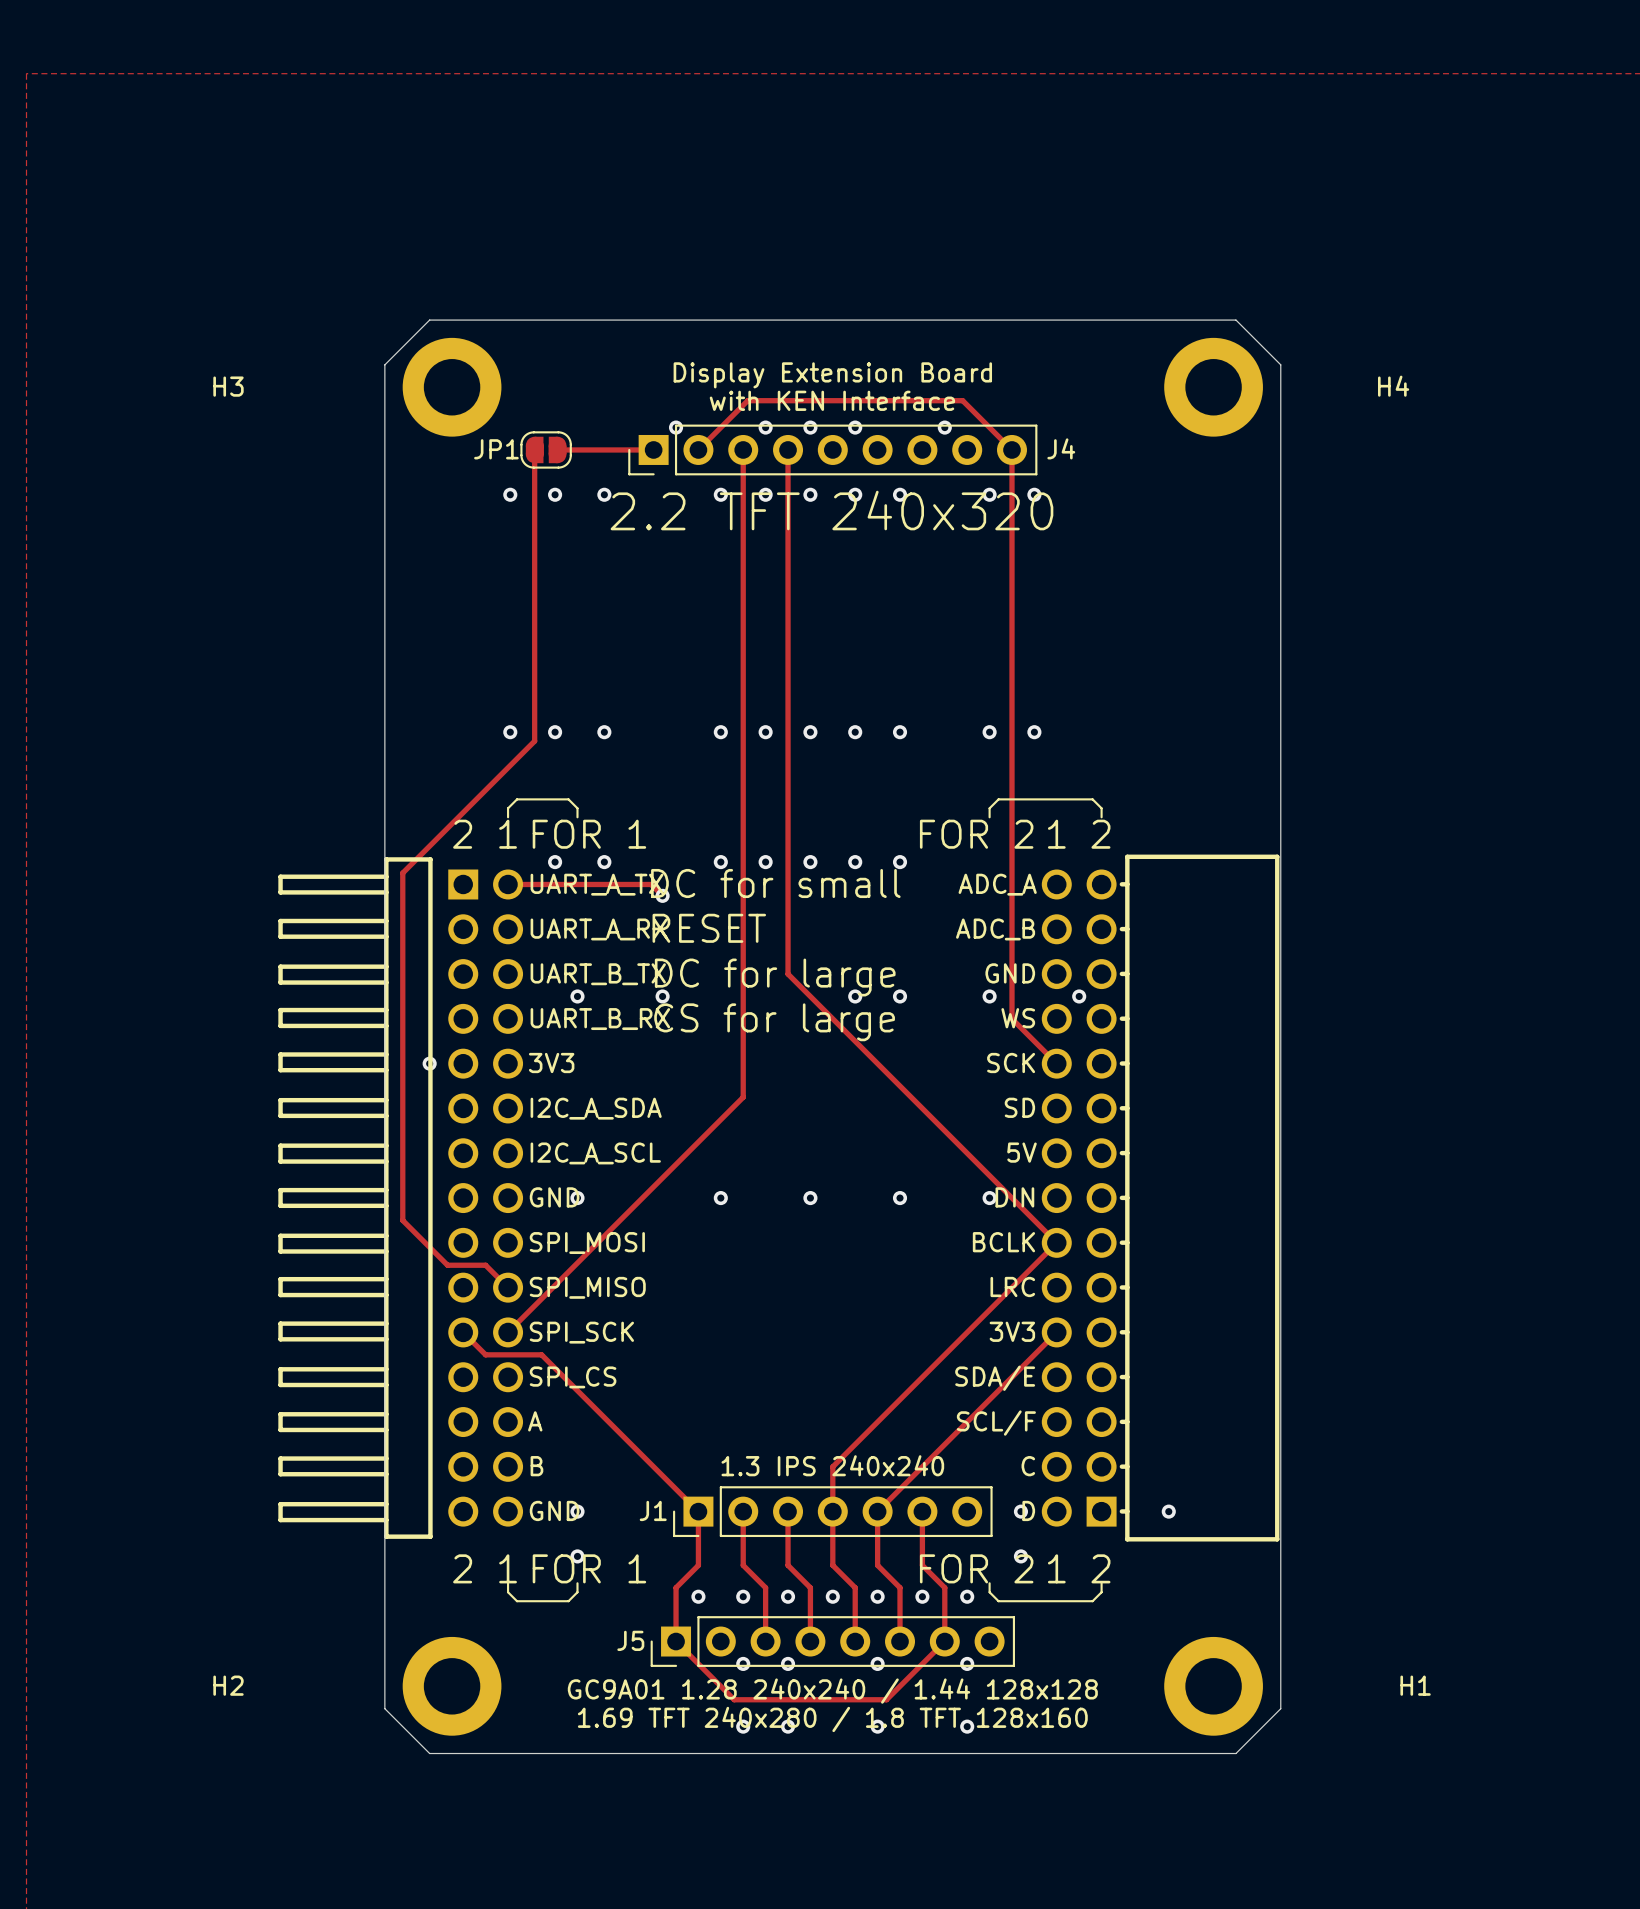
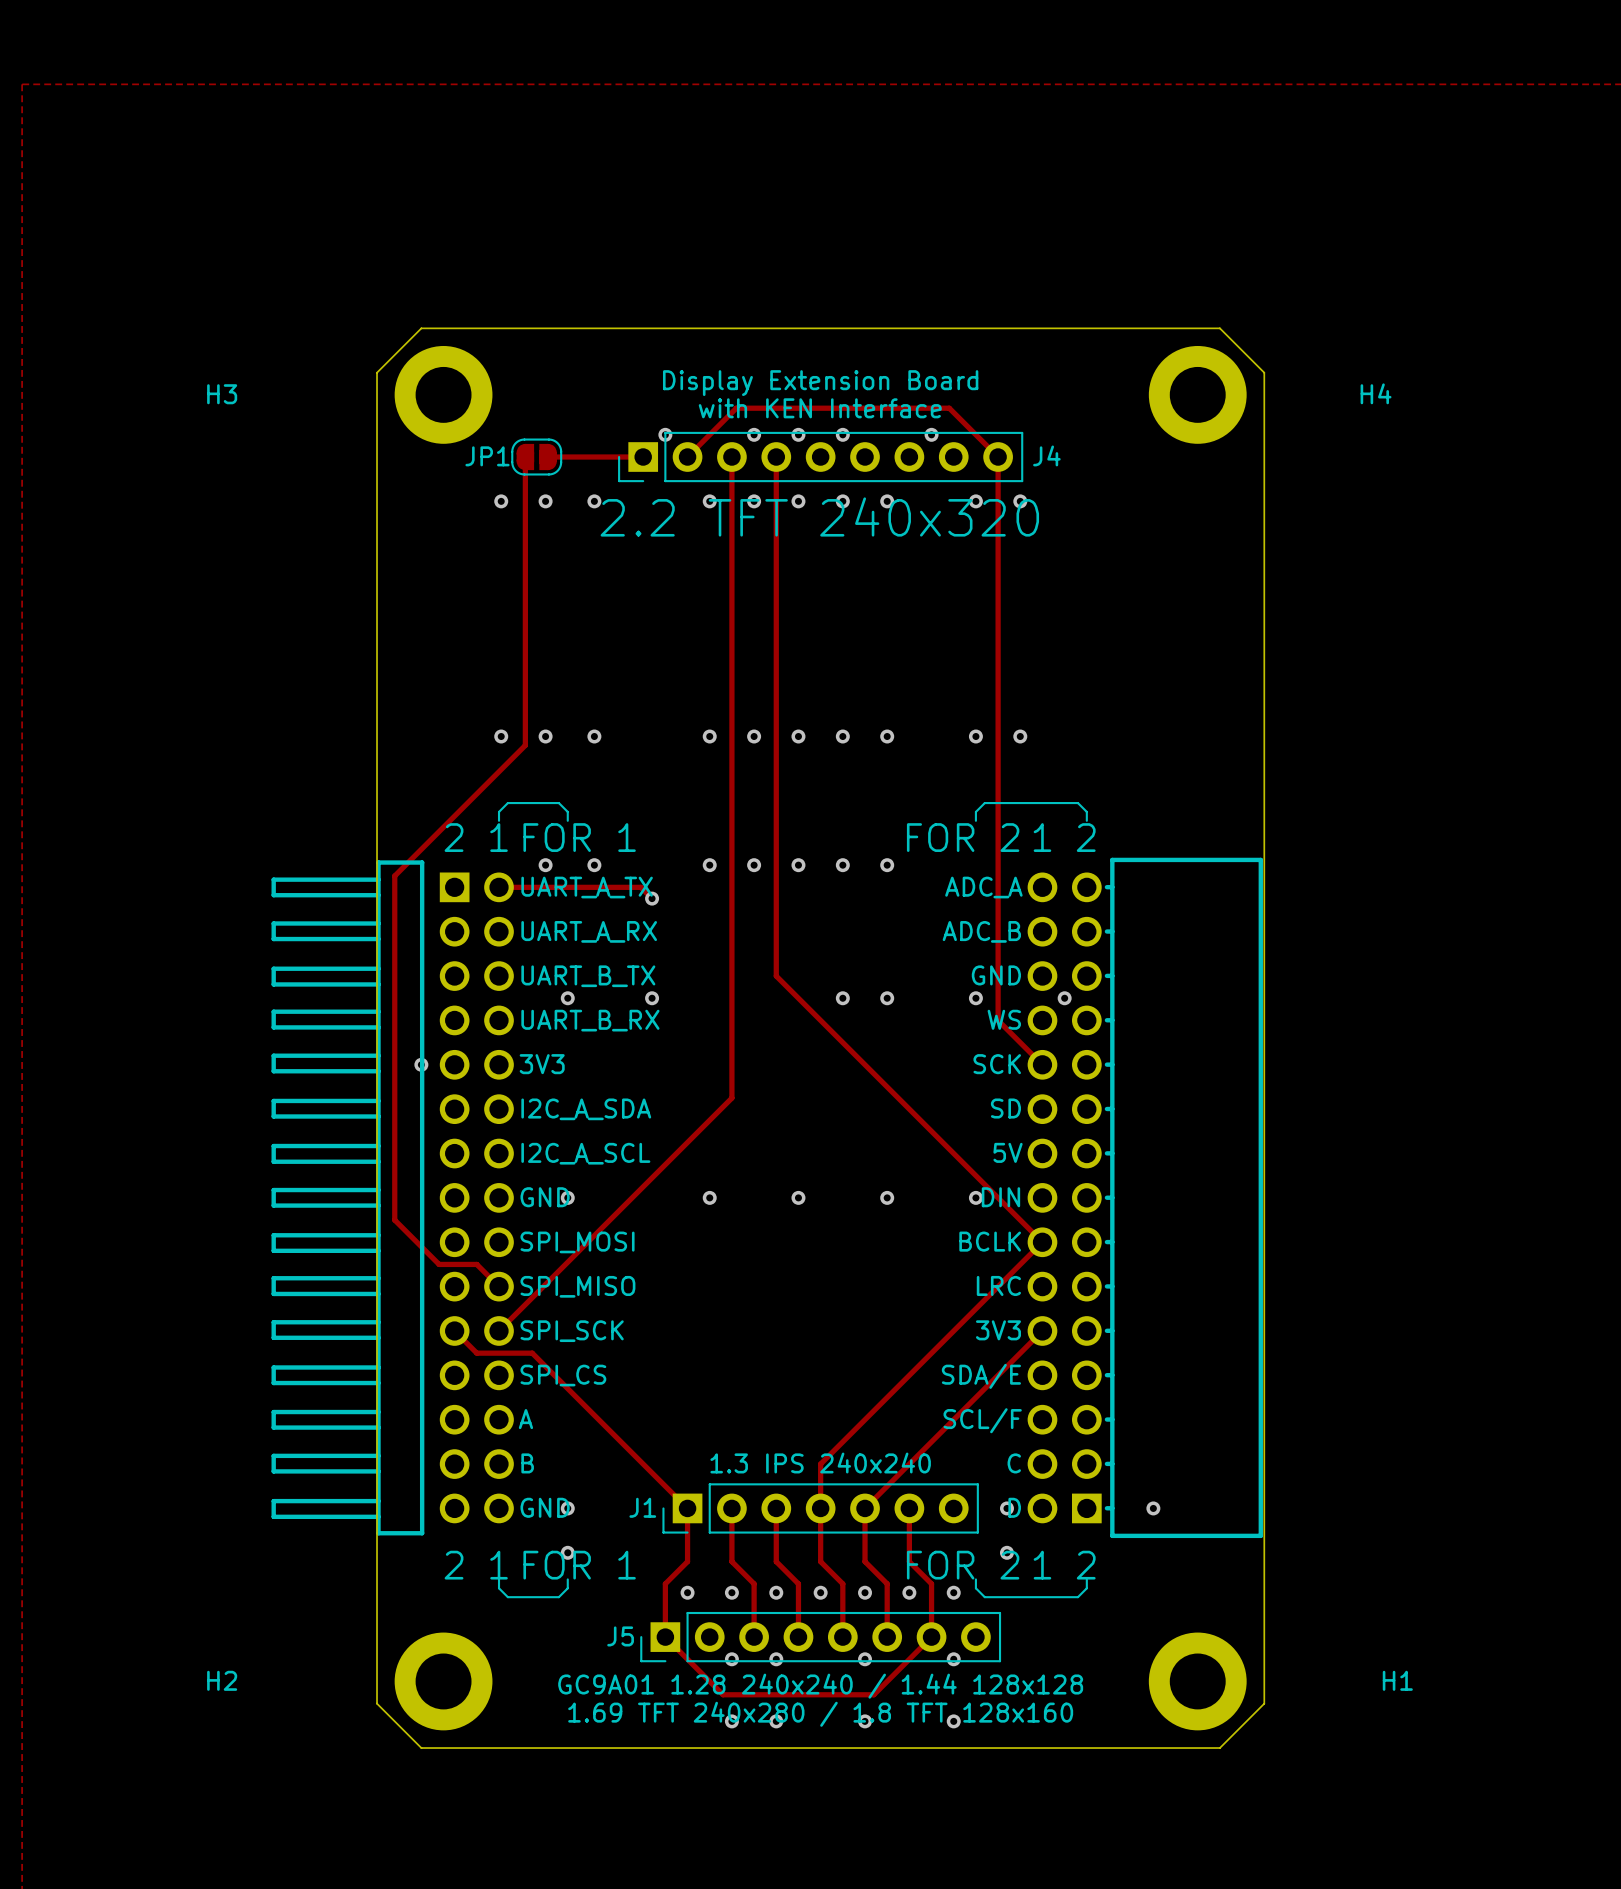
text: DC for small (775, 883) -> none
text: RESET (709, 928) -> none
text: DC for large (775, 977) -> none
text: CS for large (774, 1022) -> none

